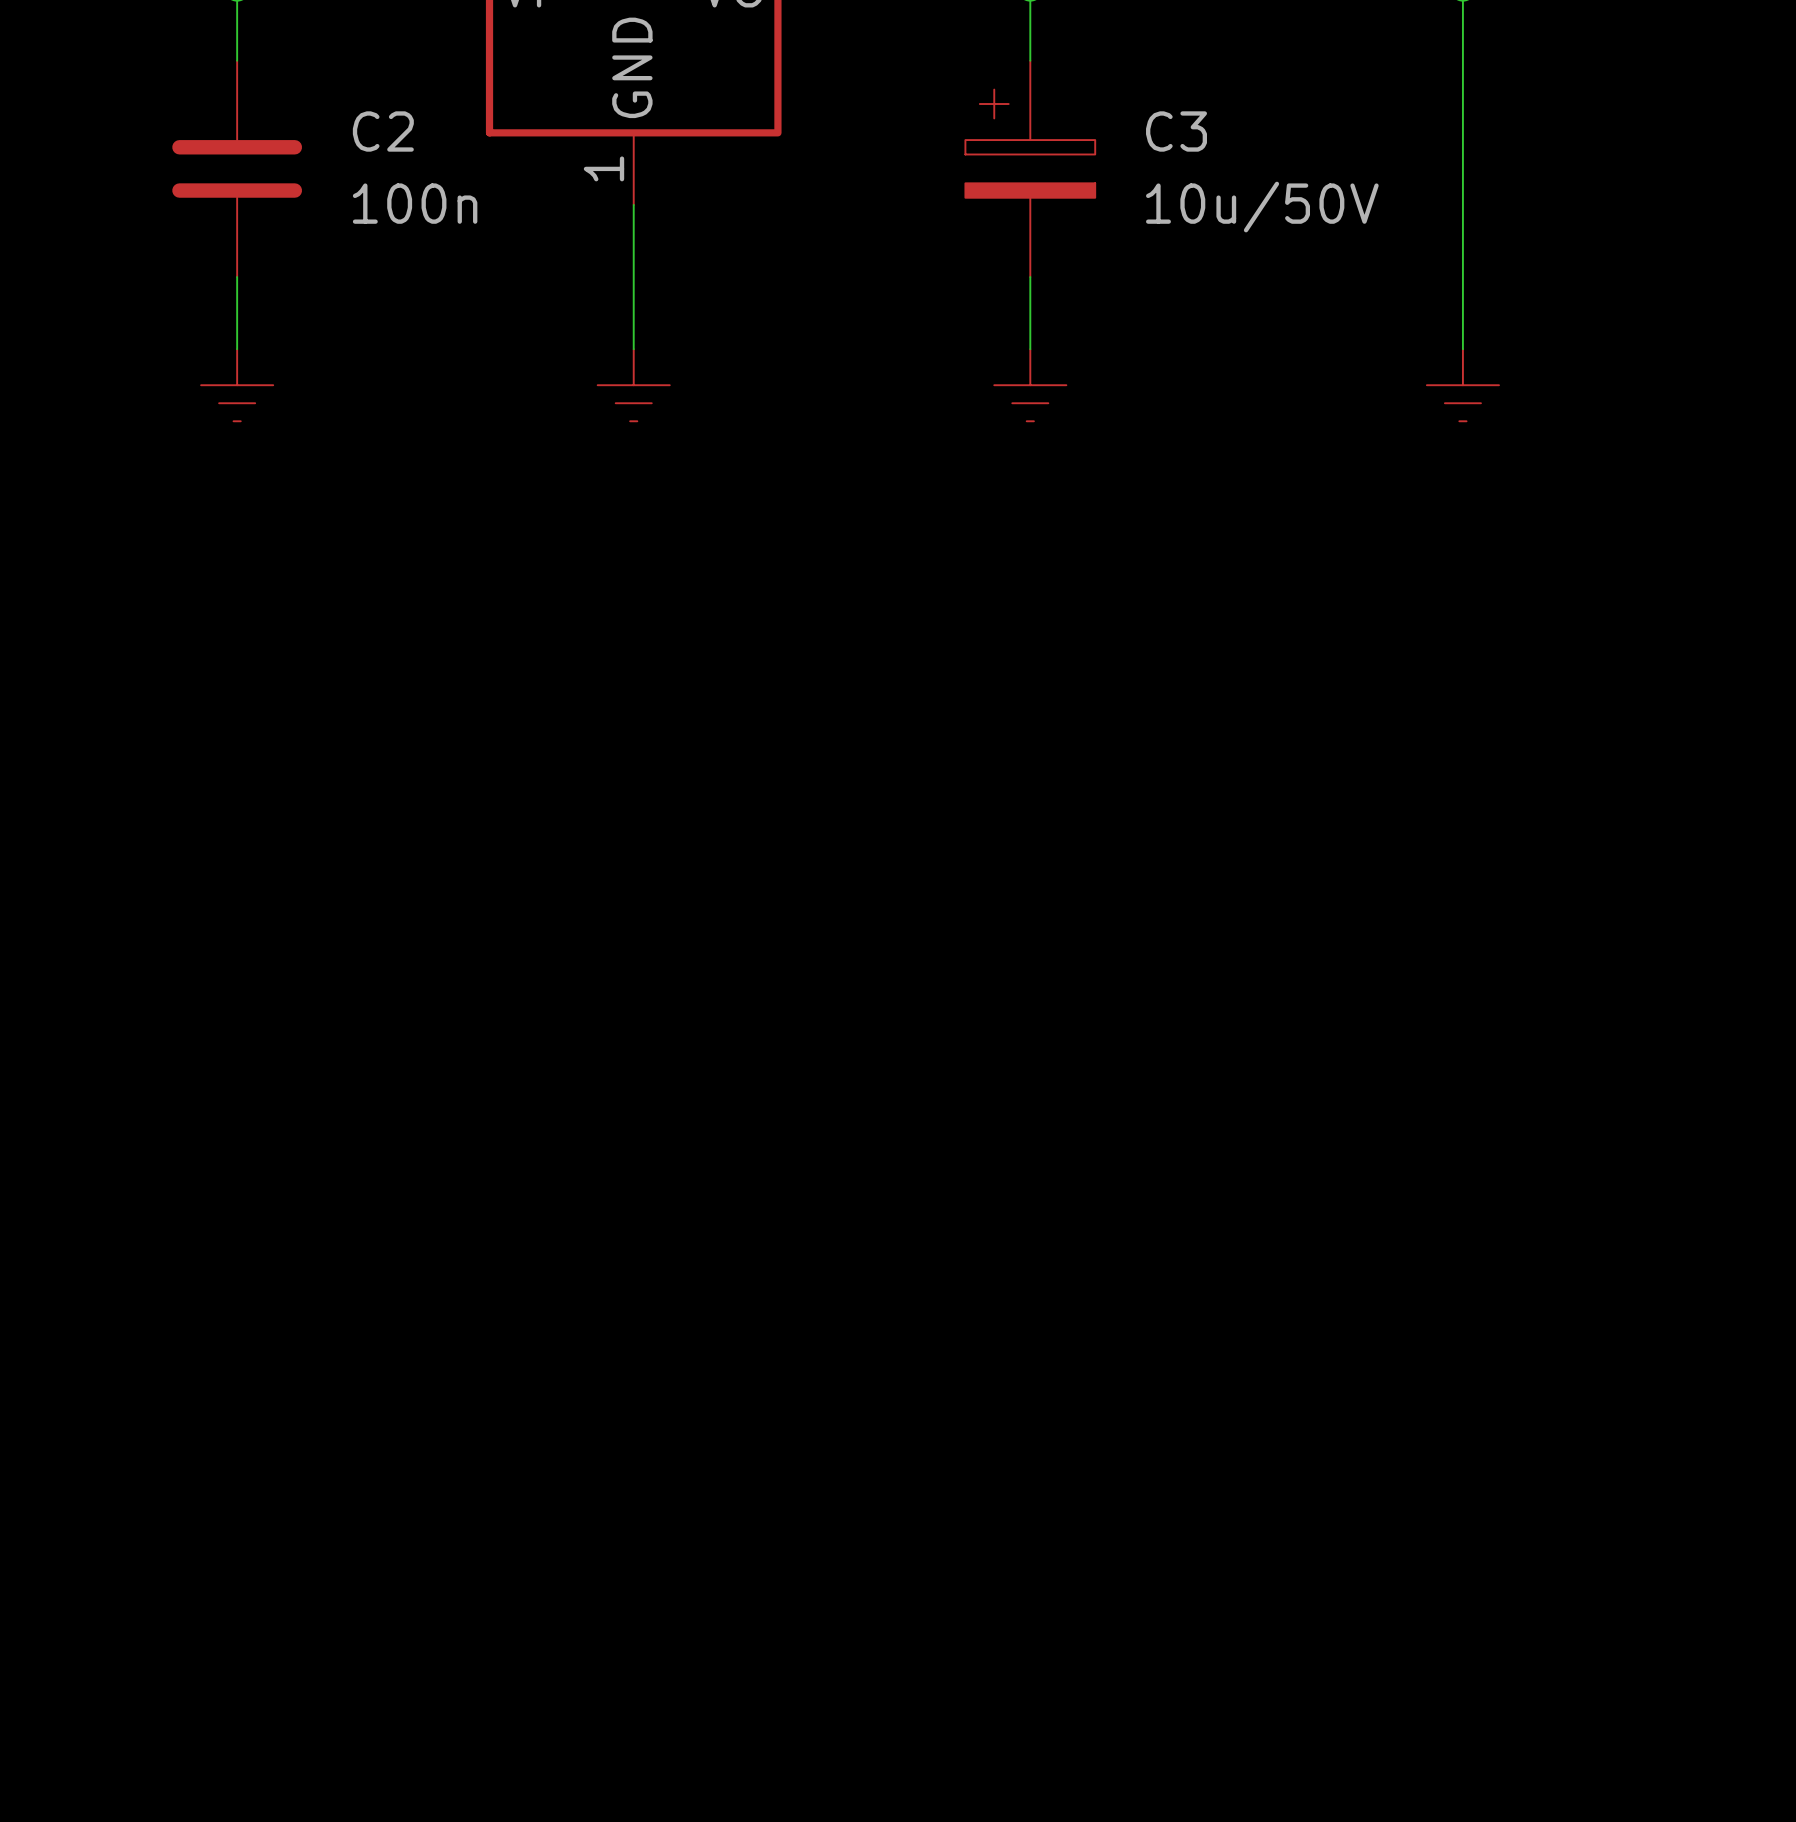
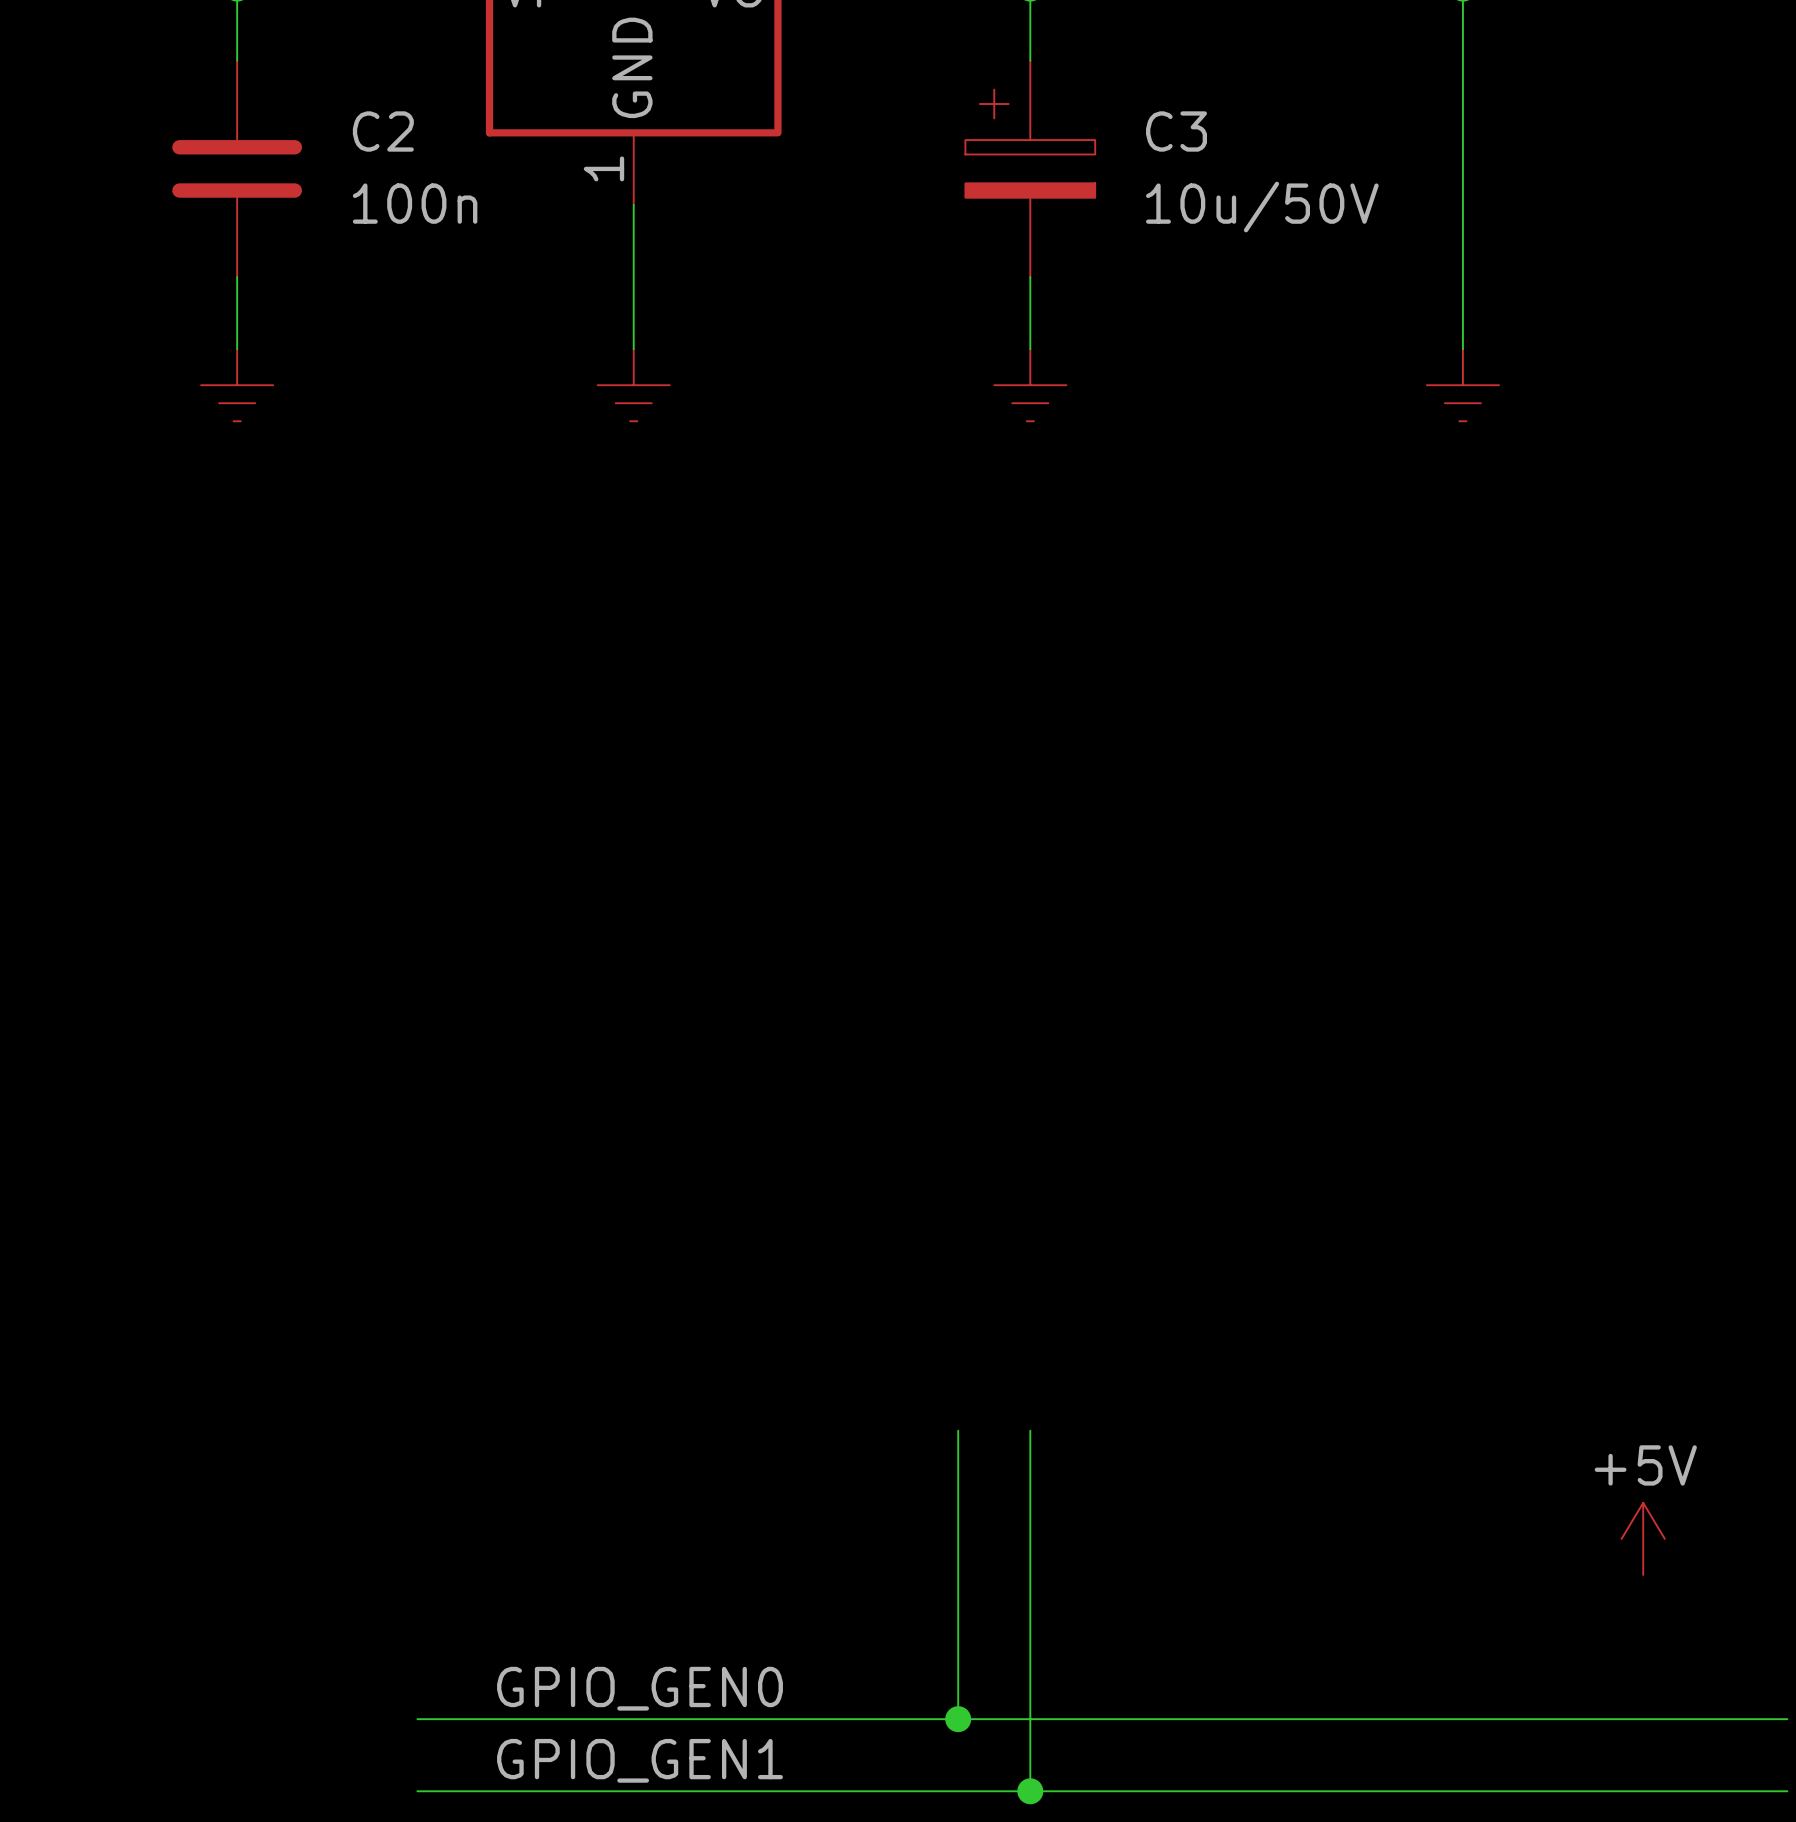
wire: none -> (958, 1430) (958, 1719)
wire: none -> (1030, 1430) (1030, 1791)
power symbol: none -> +5V (1643, 1538)
label: none -> GPIO_GEN0 (640, 1688)
wire: none -> (417, 1719) (1787, 1719)
junction: none -> (958, 1719)
label: none -> GPIO_GEN1 (640, 1760)
wire: none -> (417, 1791) (1787, 1791)
junction: none -> (1030, 1791)

